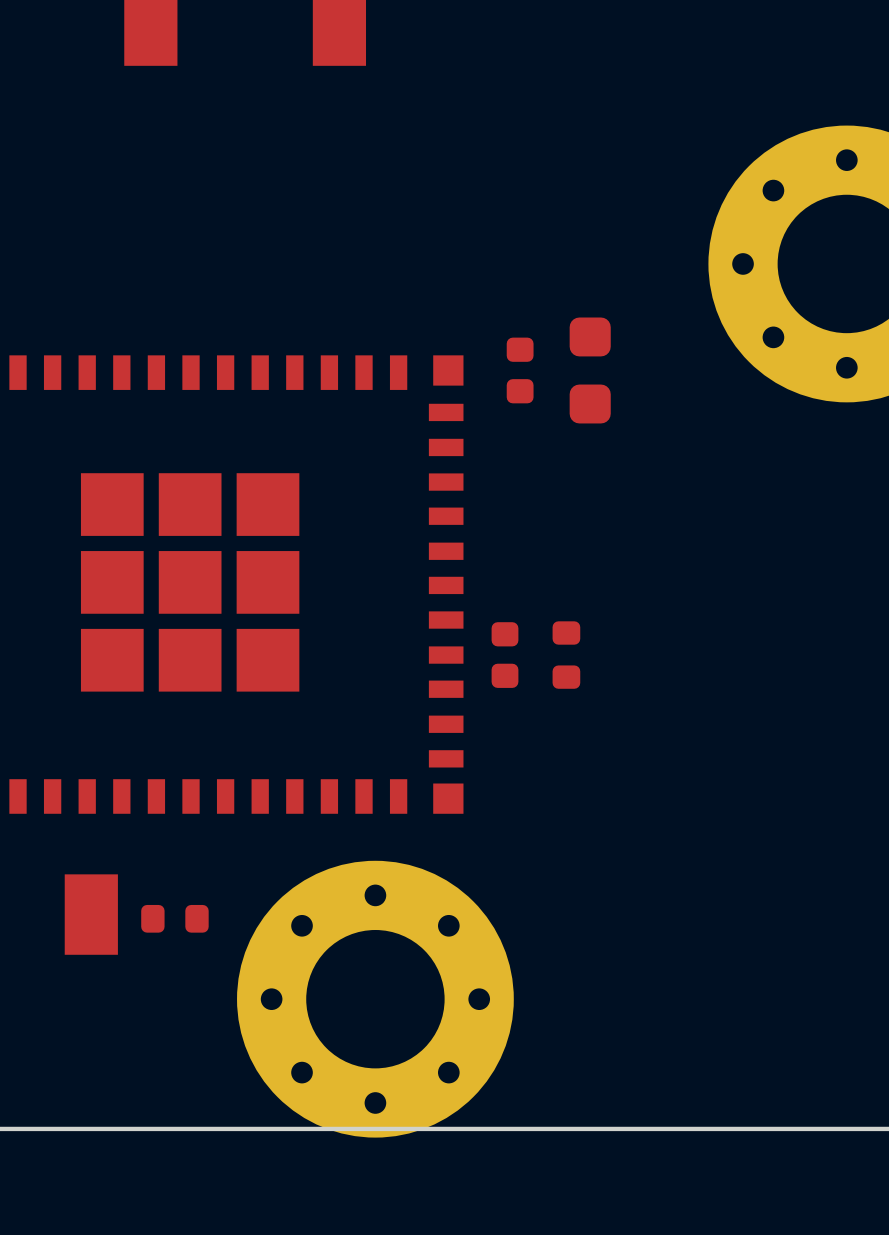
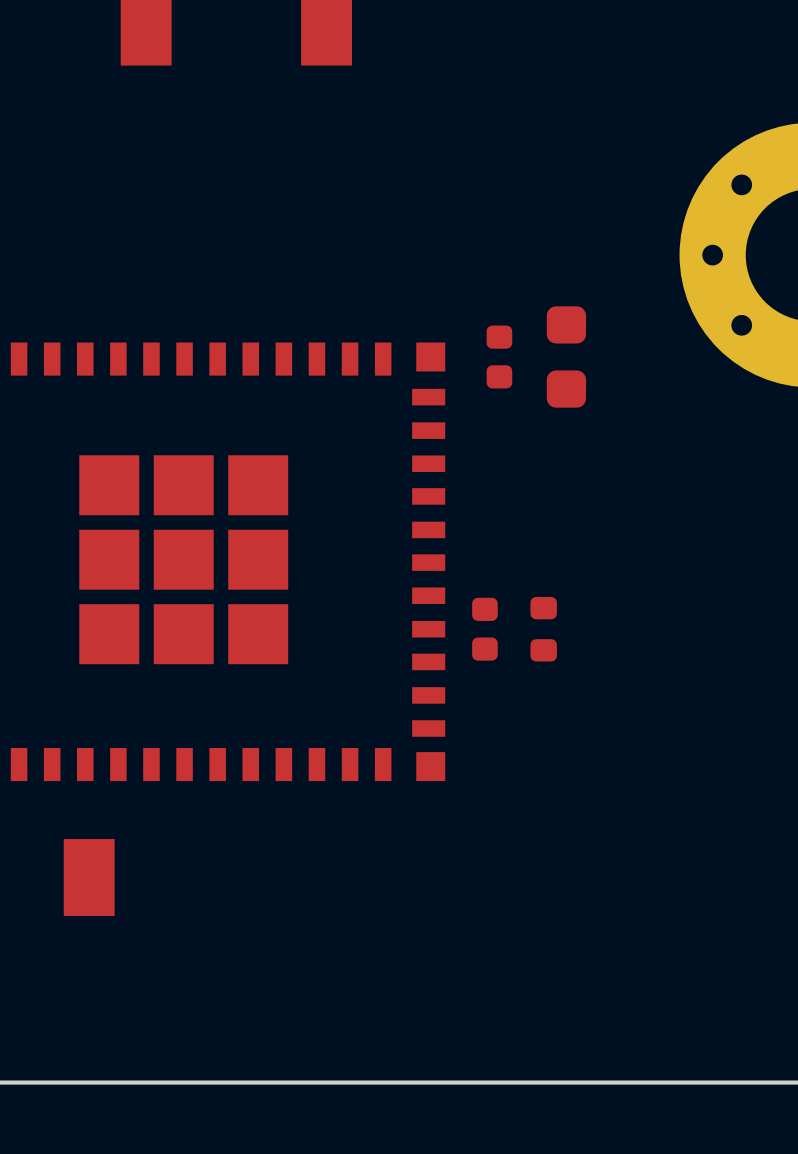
part: (174, 918) -> none
part: (375, 999) -> none

